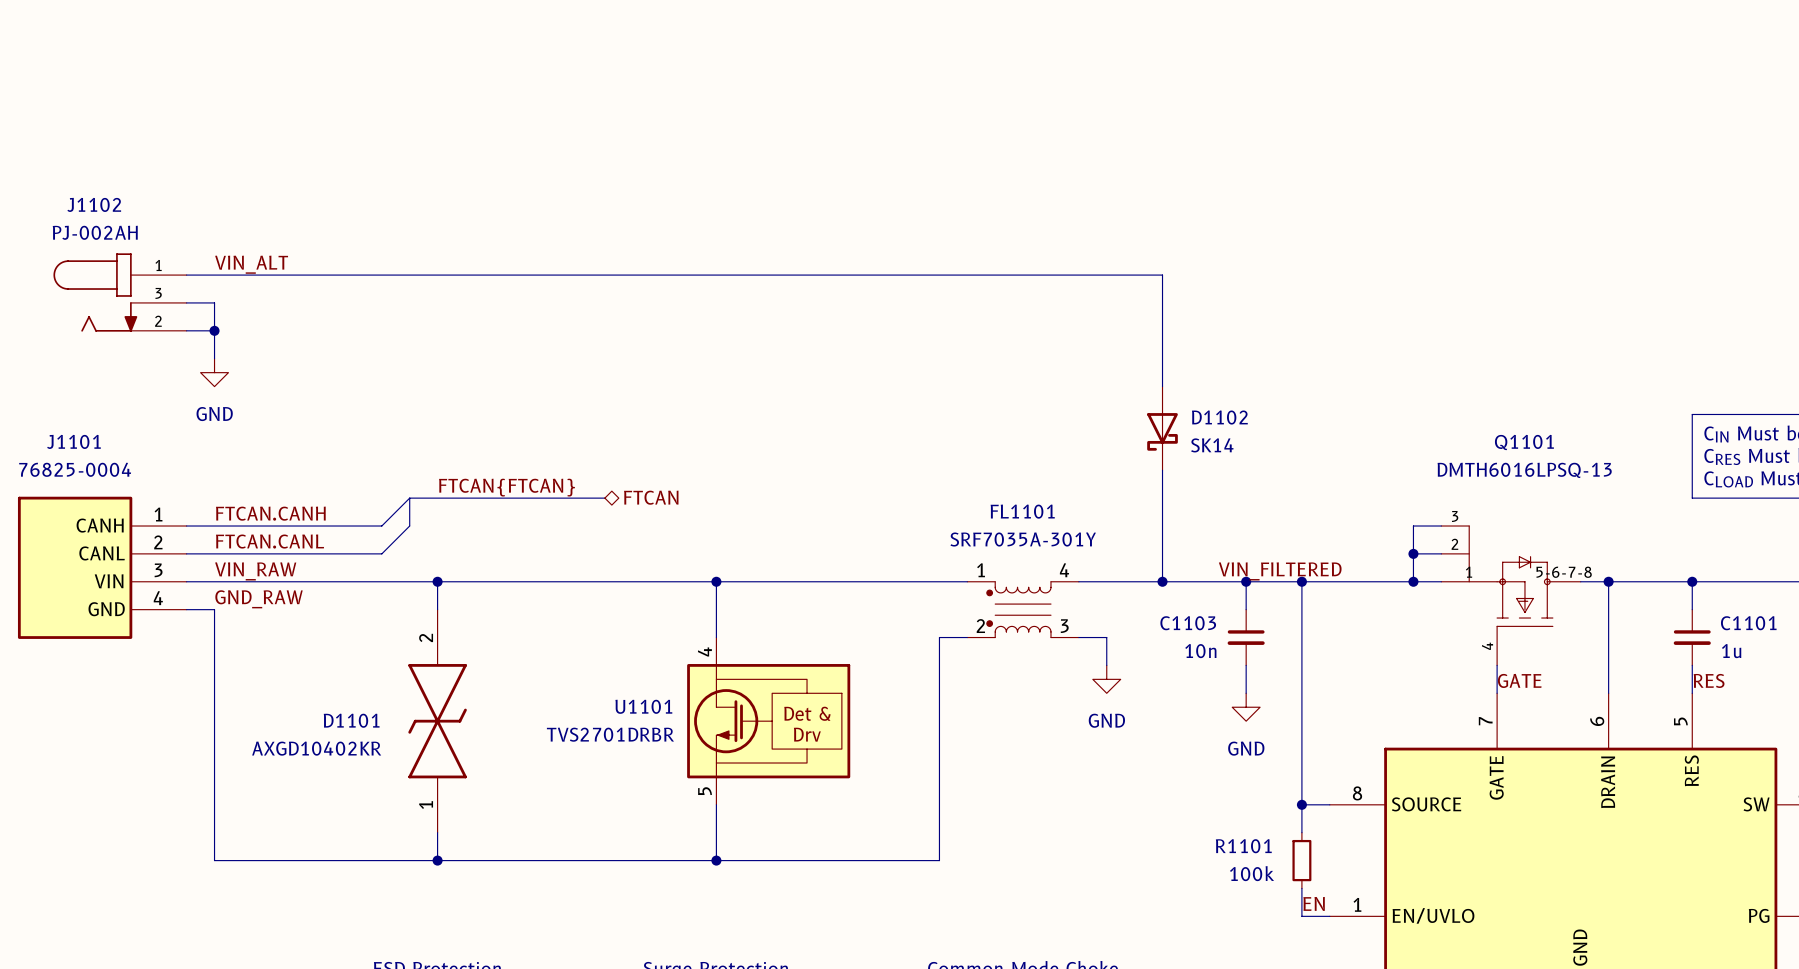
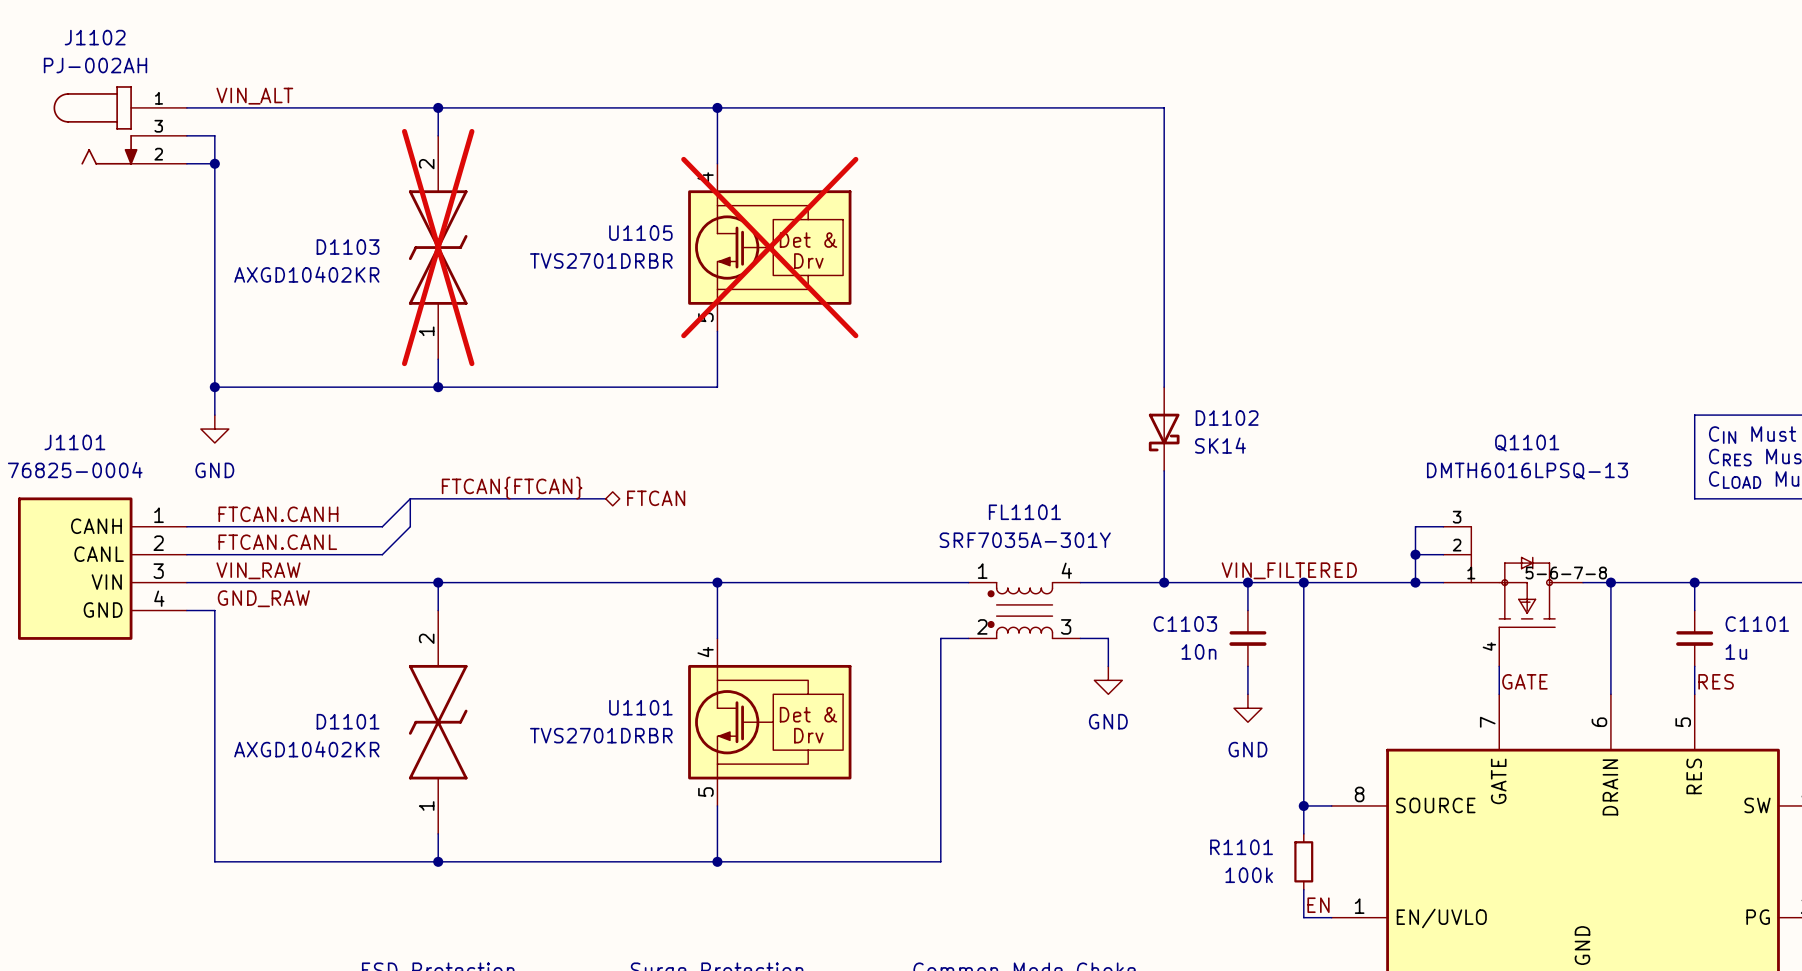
wire: none -> (438, 107) (438, 135)
junction: none -> (438, 107)
wire: none -> (717, 107) (717, 163)
junction: none -> (717, 107)
junction: none -> (214, 163)
D1103: none -> AXGD10402KR (438, 247)
U1105: none -> TVS2701DRBR (769, 247)
label position: VIN_ALT (251, 264) -> VIN_ALT (254, 96)
wire: (186, 275) (1162, 275) -> (186, 107) (1164, 107) (1164, 275)
J1102 position: (120, 292) -> (120, 125)
wire: (186, 302) (214, 302) -> (186, 135) (214, 135) (214, 303)
wire: (186, 330) (214, 330) -> (186, 163) (214, 163)
junction position: (214, 330) -> (214, 387)
wire: none -> (717, 331) (717, 387) (214, 387)
wire: none -> (214, 359) (214, 415)
wire: none -> (438, 359) (438, 387)
power symbol position: GND (214, 372) -> GND (214, 429)
junction: none -> (438, 387)

